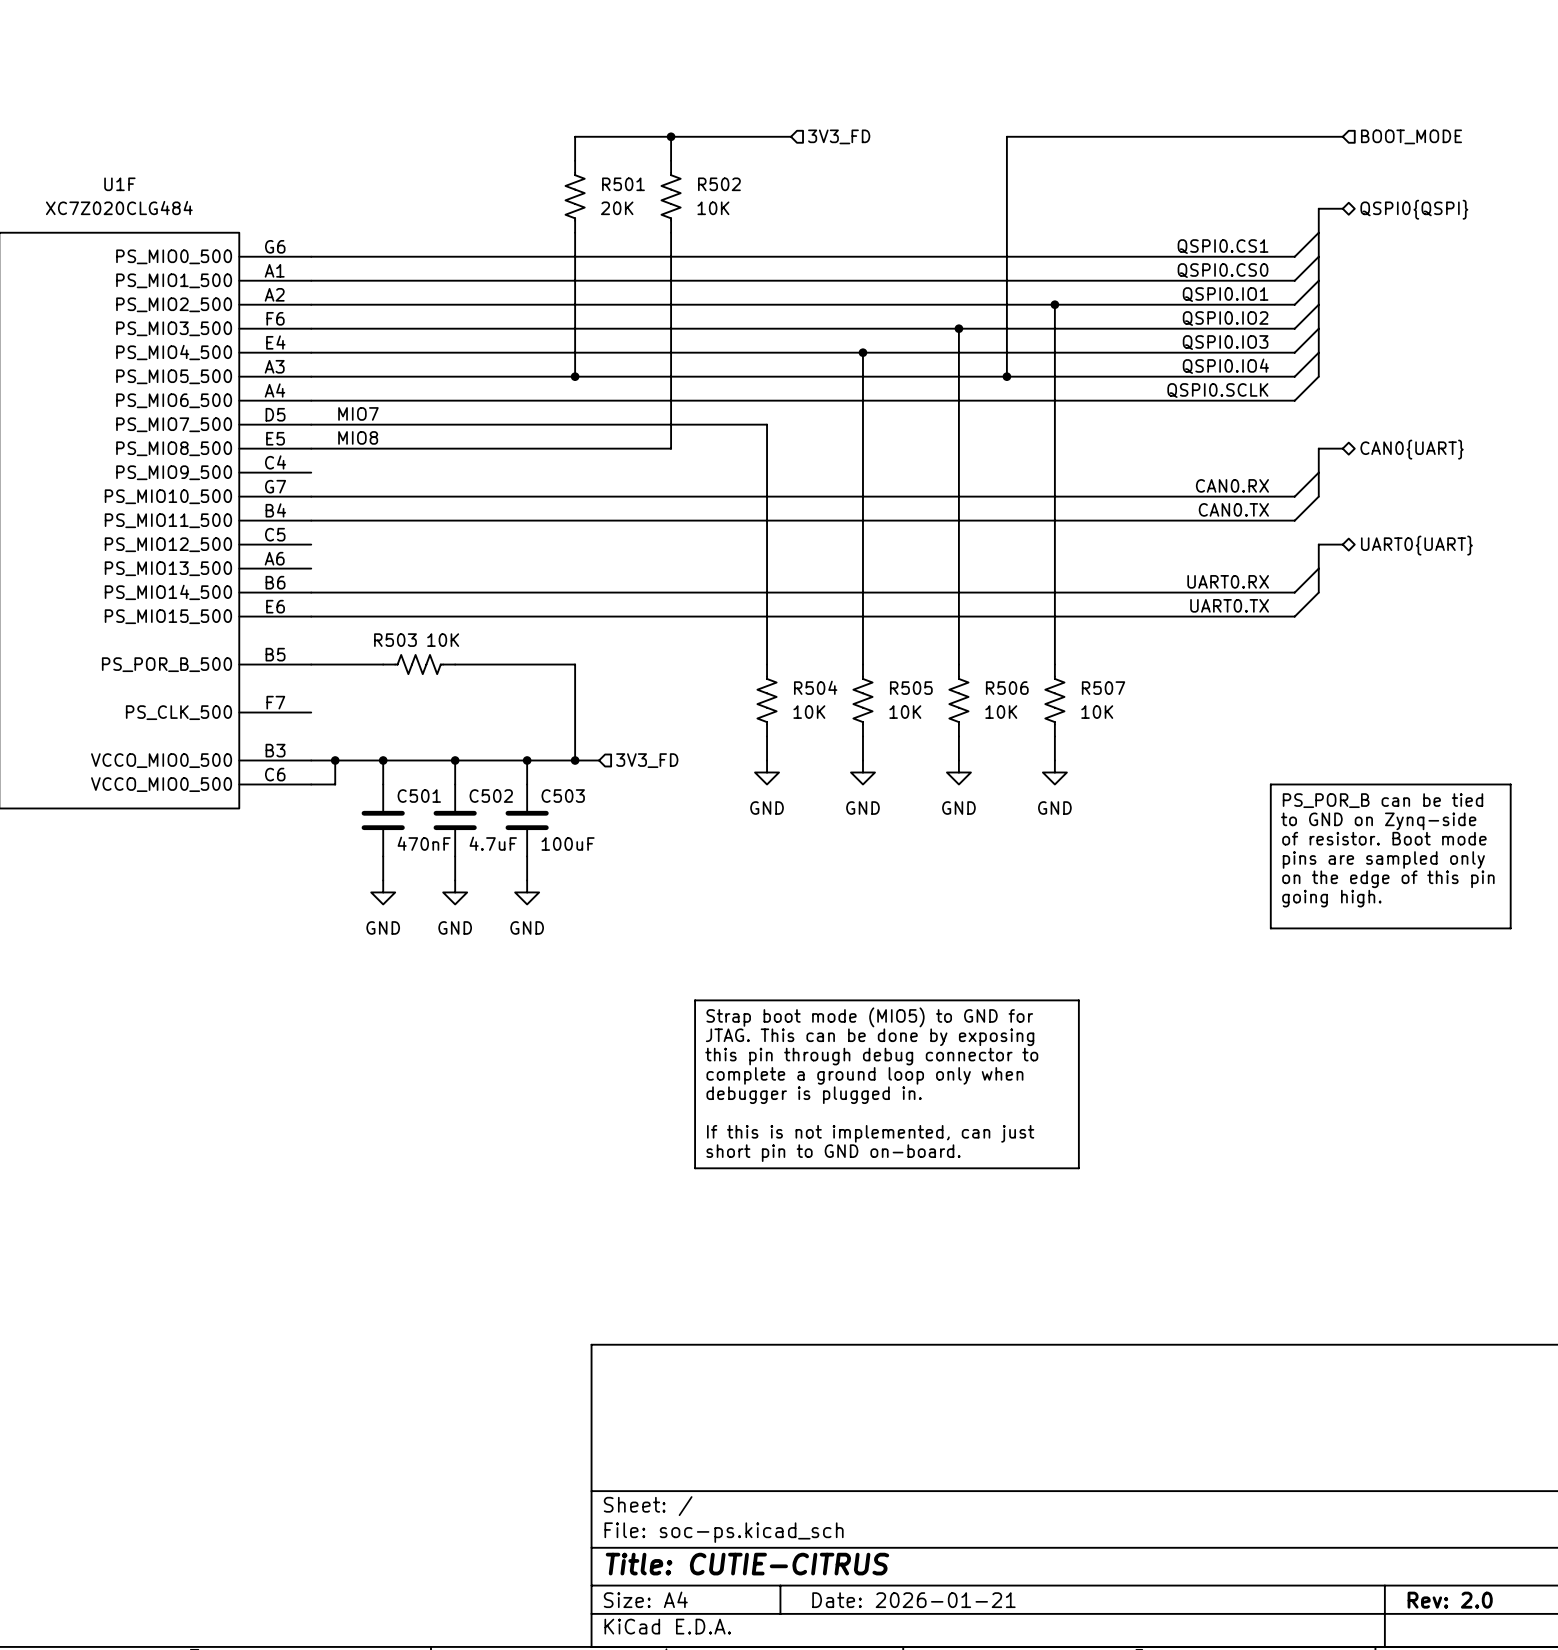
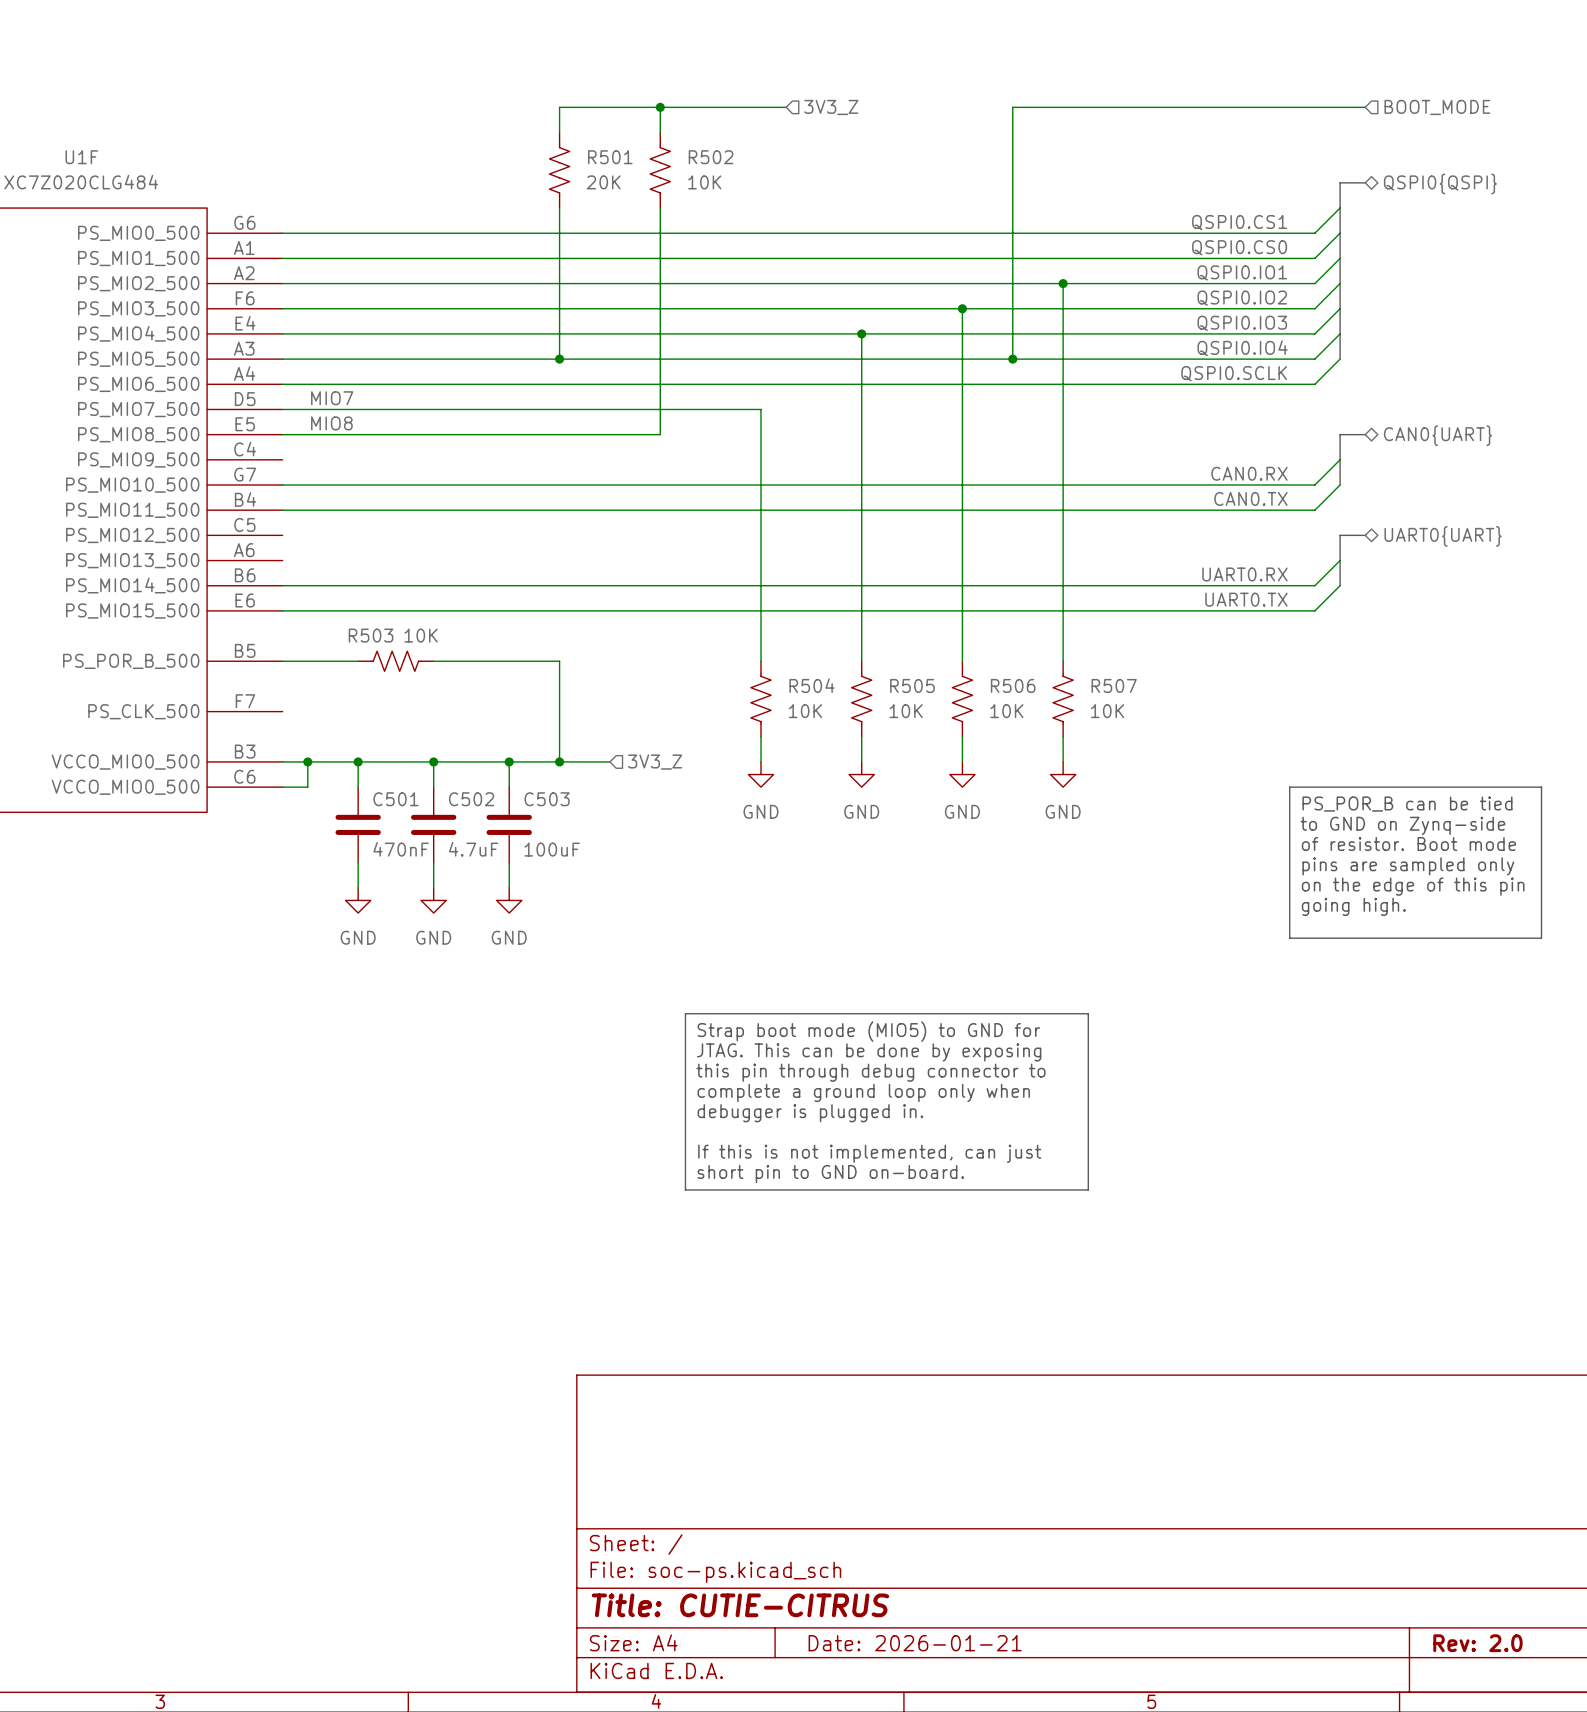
hierarchical label: 3V3_FD (839, 136) -> 3V3_Z (831, 107)
wire: none -> (584, 761) (609, 761)
hierarchical label: 3V3_FD (647, 760) -> 3V3_Z (655, 762)

